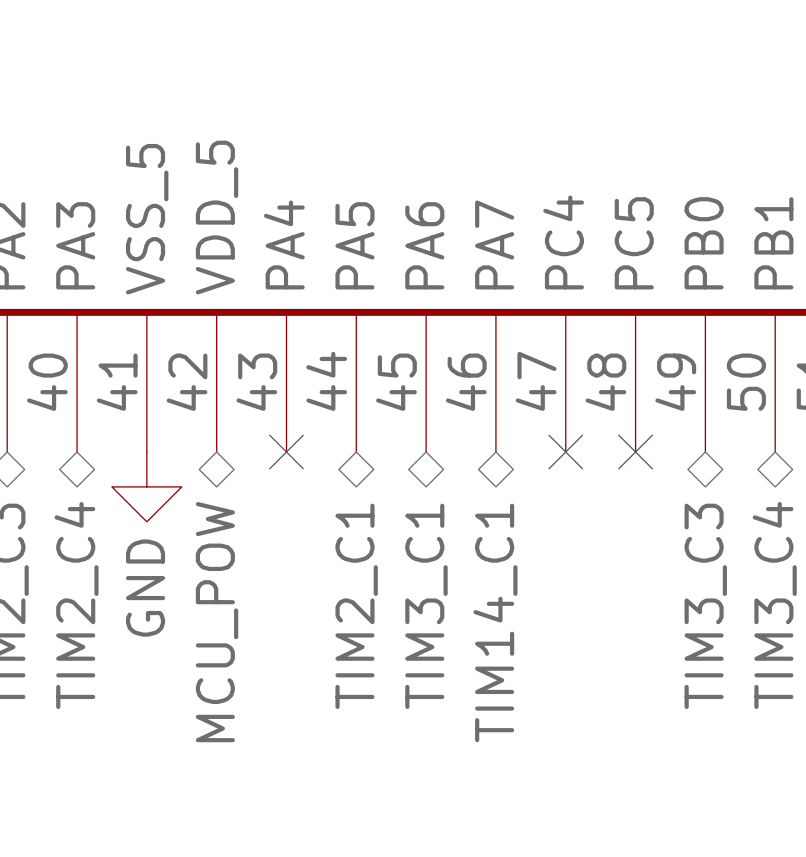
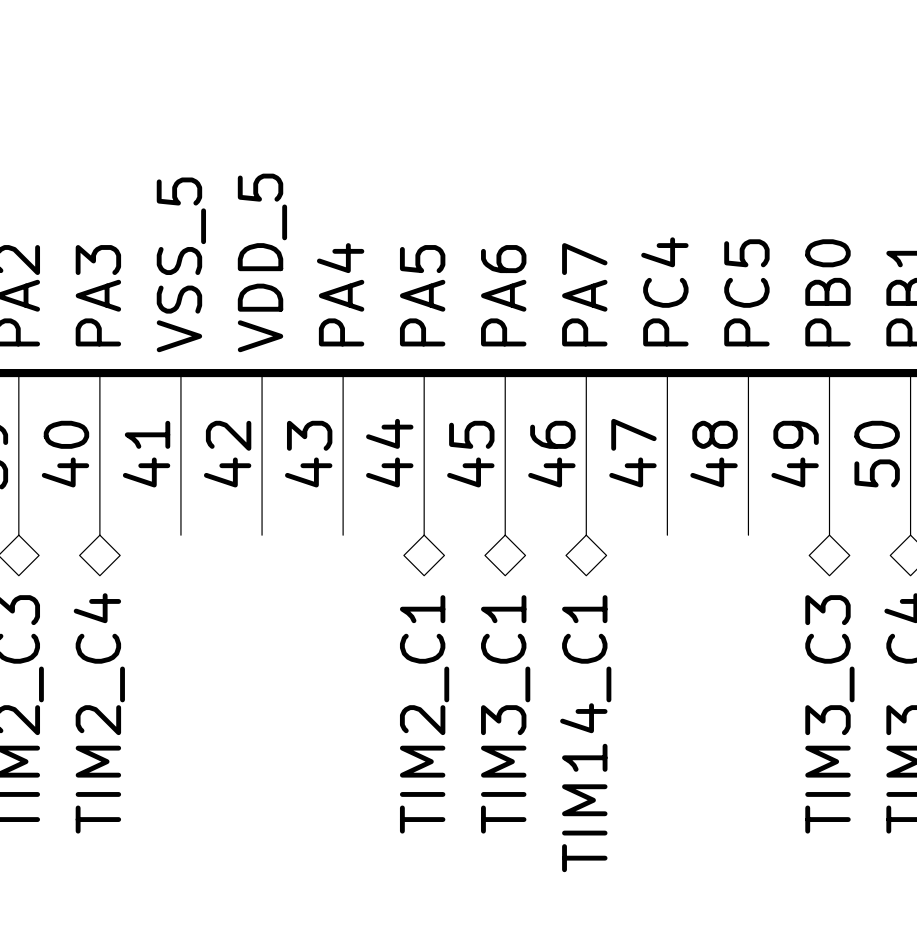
no-connect mark: (286, 452) -> none
no-connect mark: (565, 452) -> none
no-connect mark: (635, 452) -> none
power symbol: GND (146, 486) -> none
hierarchical label: MCU_POW (217, 622) -> none

